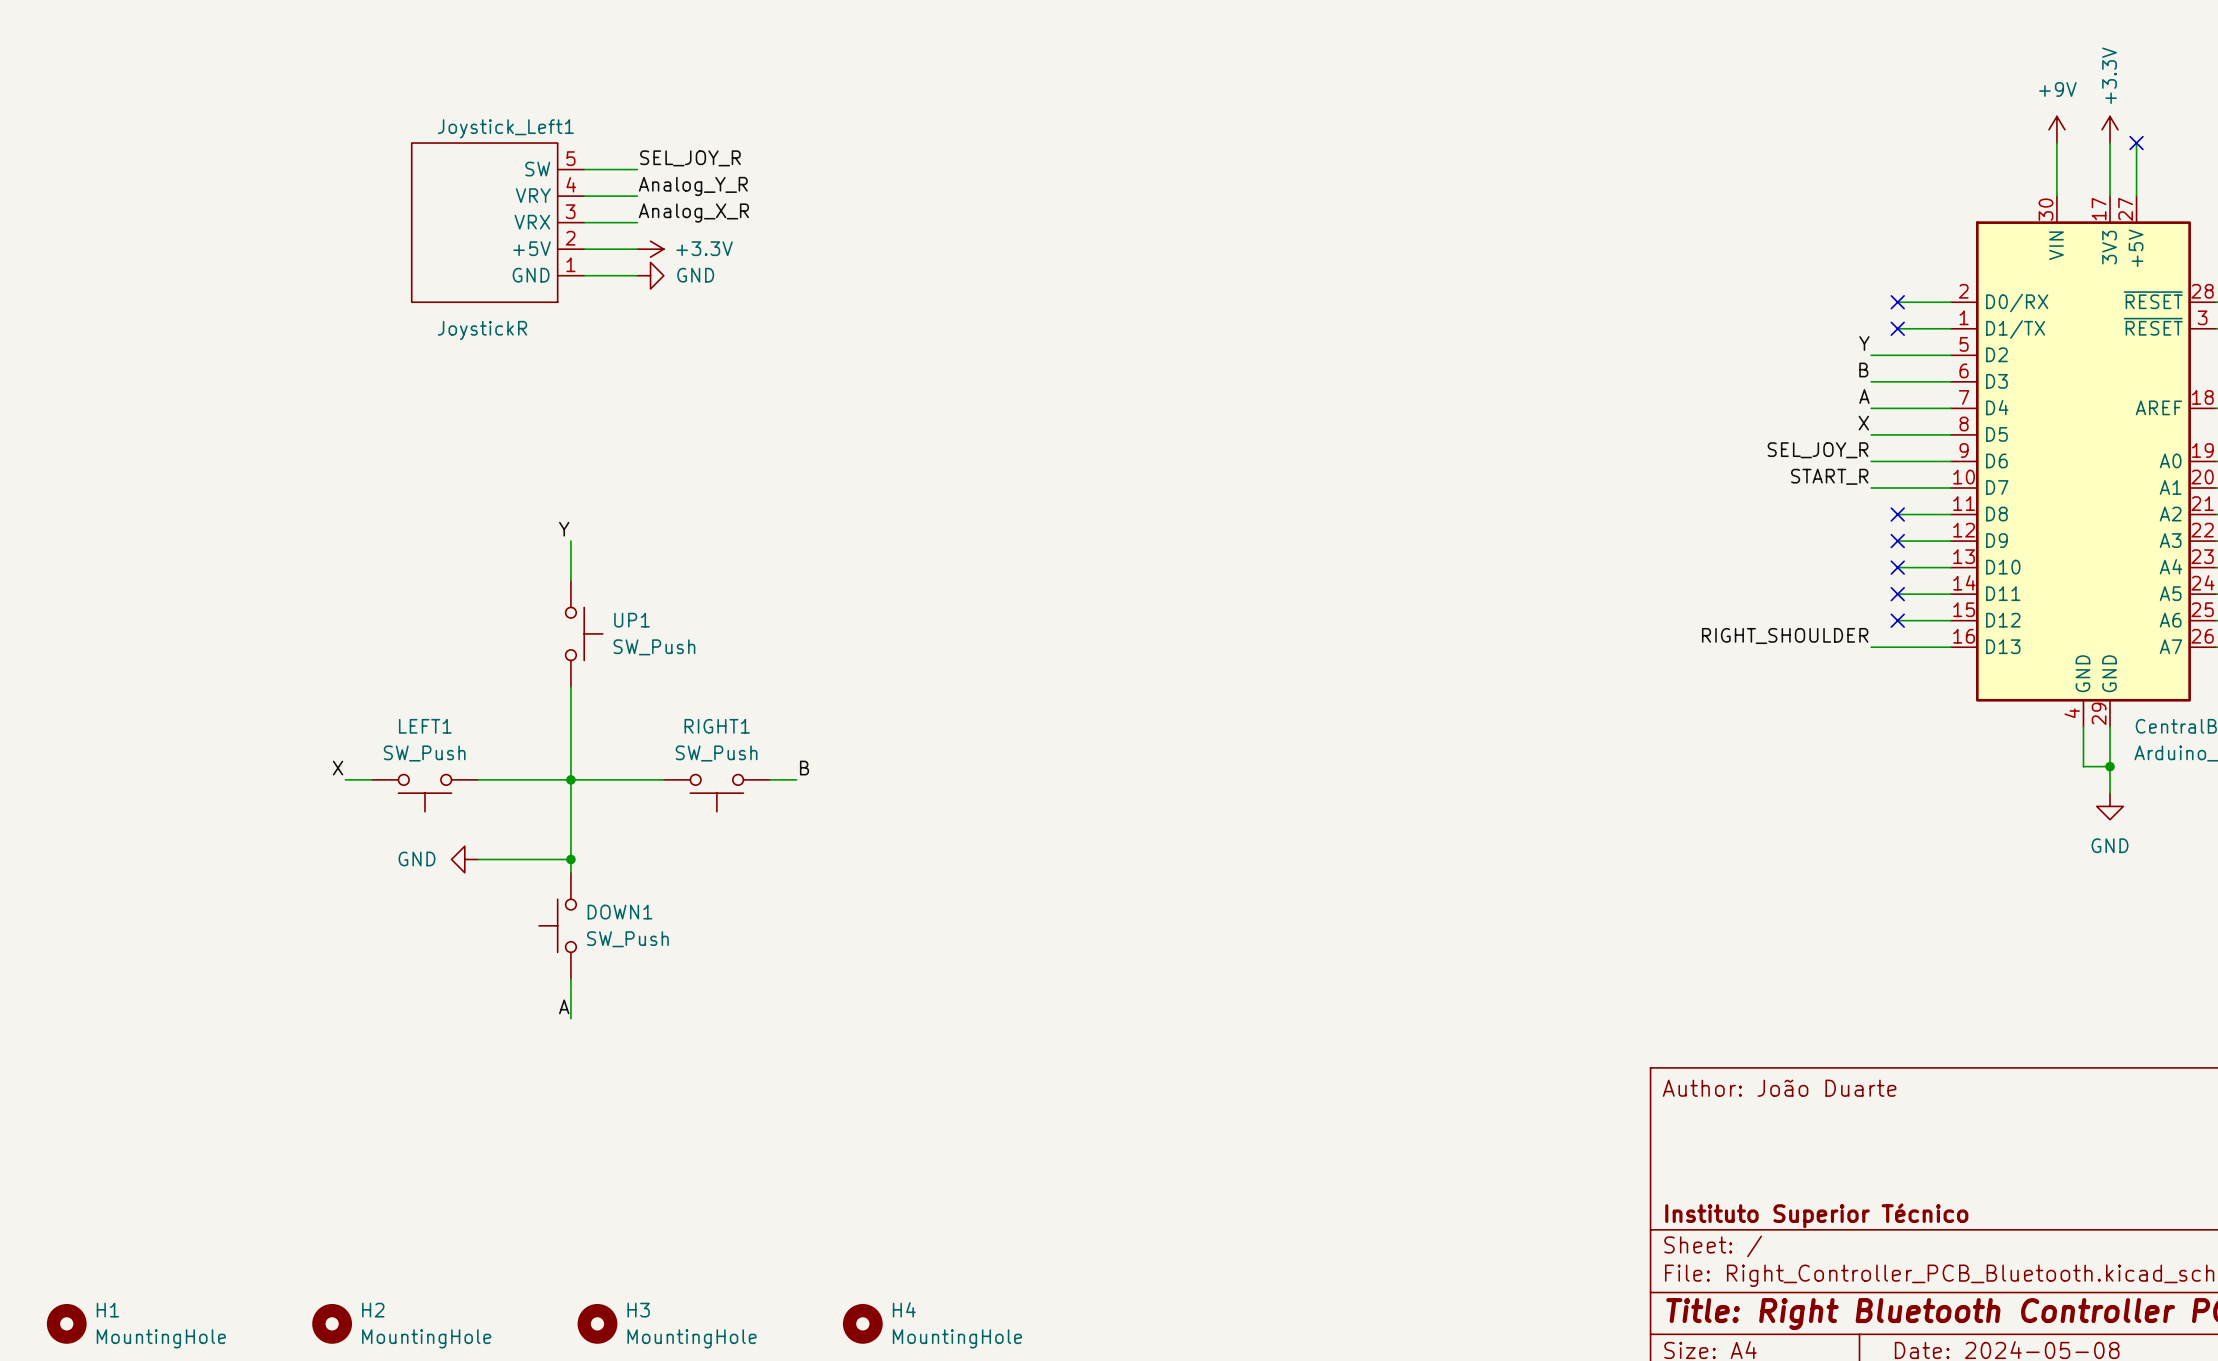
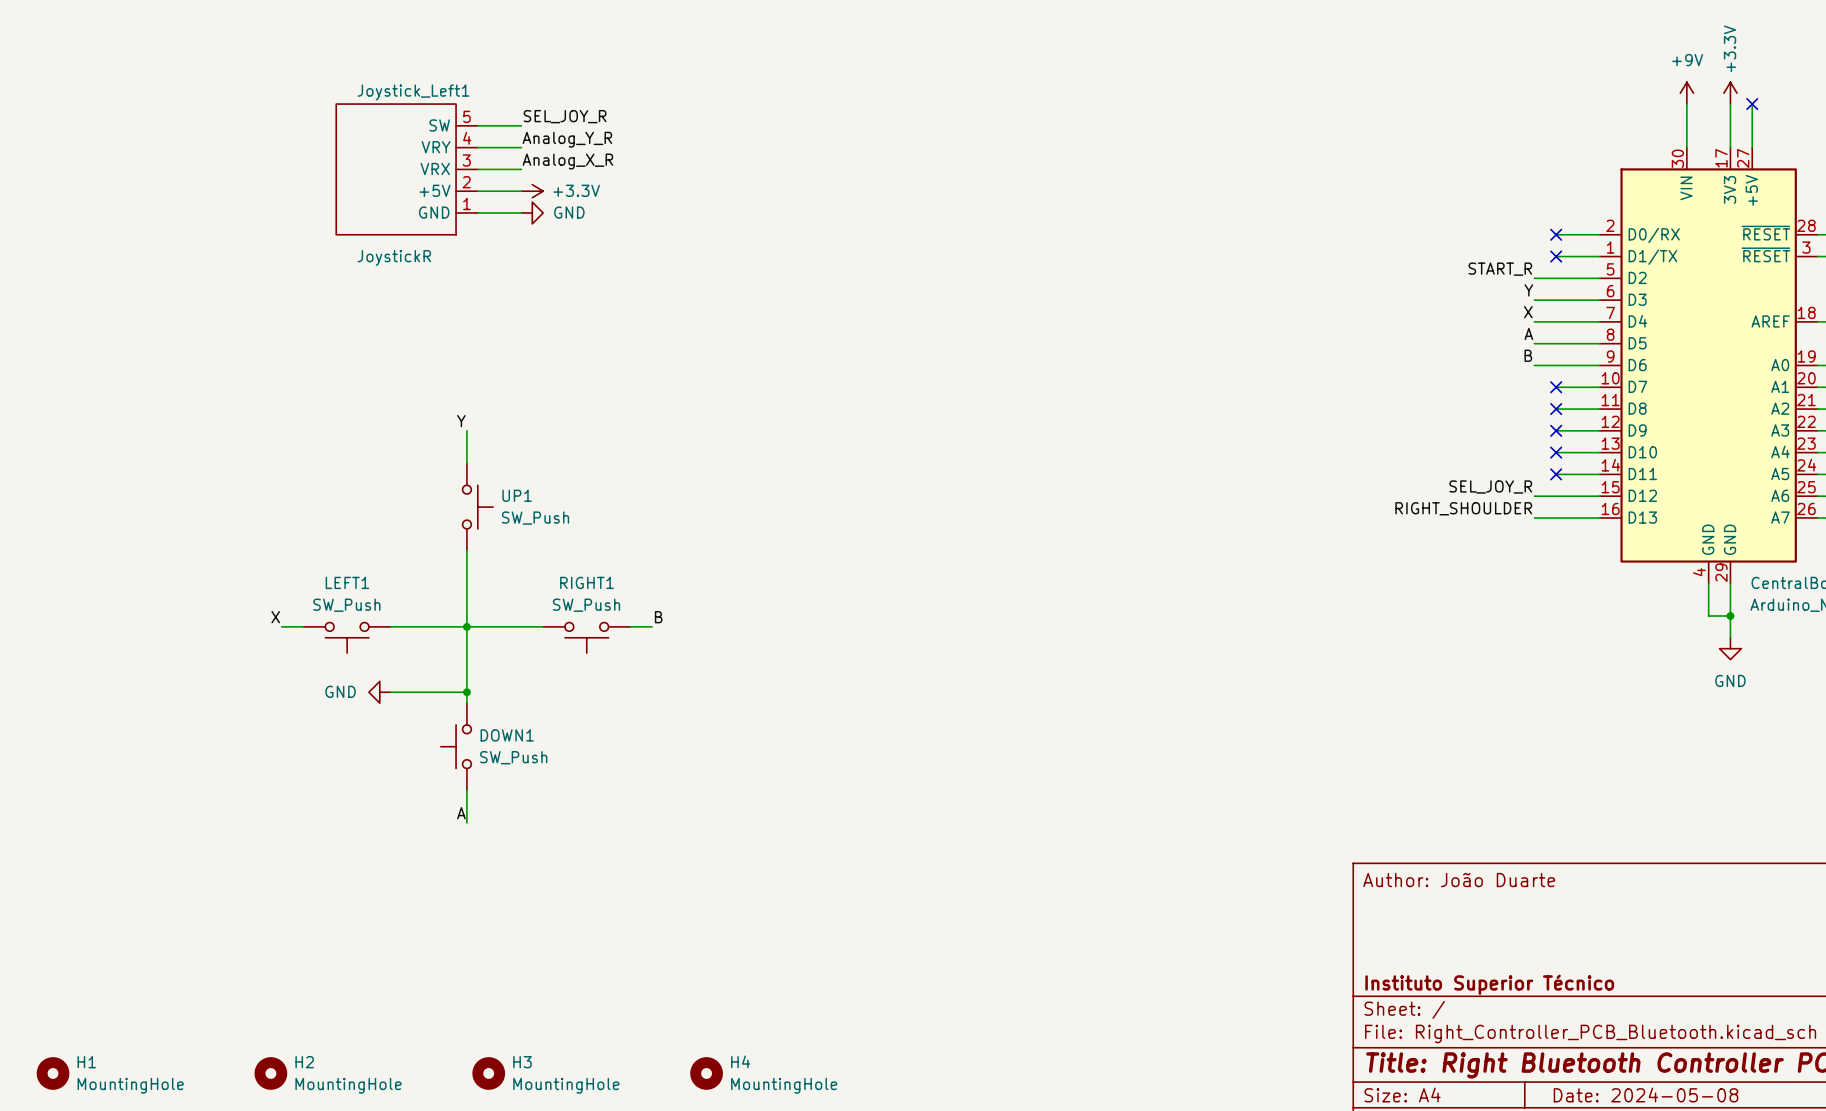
label: Y (1864, 343) -> START_R (1500, 269)
label: B (1863, 370) -> Y (1528, 290)
label: A (1864, 396) -> X (1528, 312)
label: X (1863, 423) -> A (1528, 333)
label: SEL_JOY_R (1818, 450) -> B (1528, 355)
label: START_R (1829, 476) -> none
wire: (1871, 487) (1897, 487) -> (1534, 496) (1556, 496)
no-connect mark: none -> (1556, 387)
label: none -> SEL_JOY_R (1490, 486)
no-connect mark: (1897, 620) -> none

